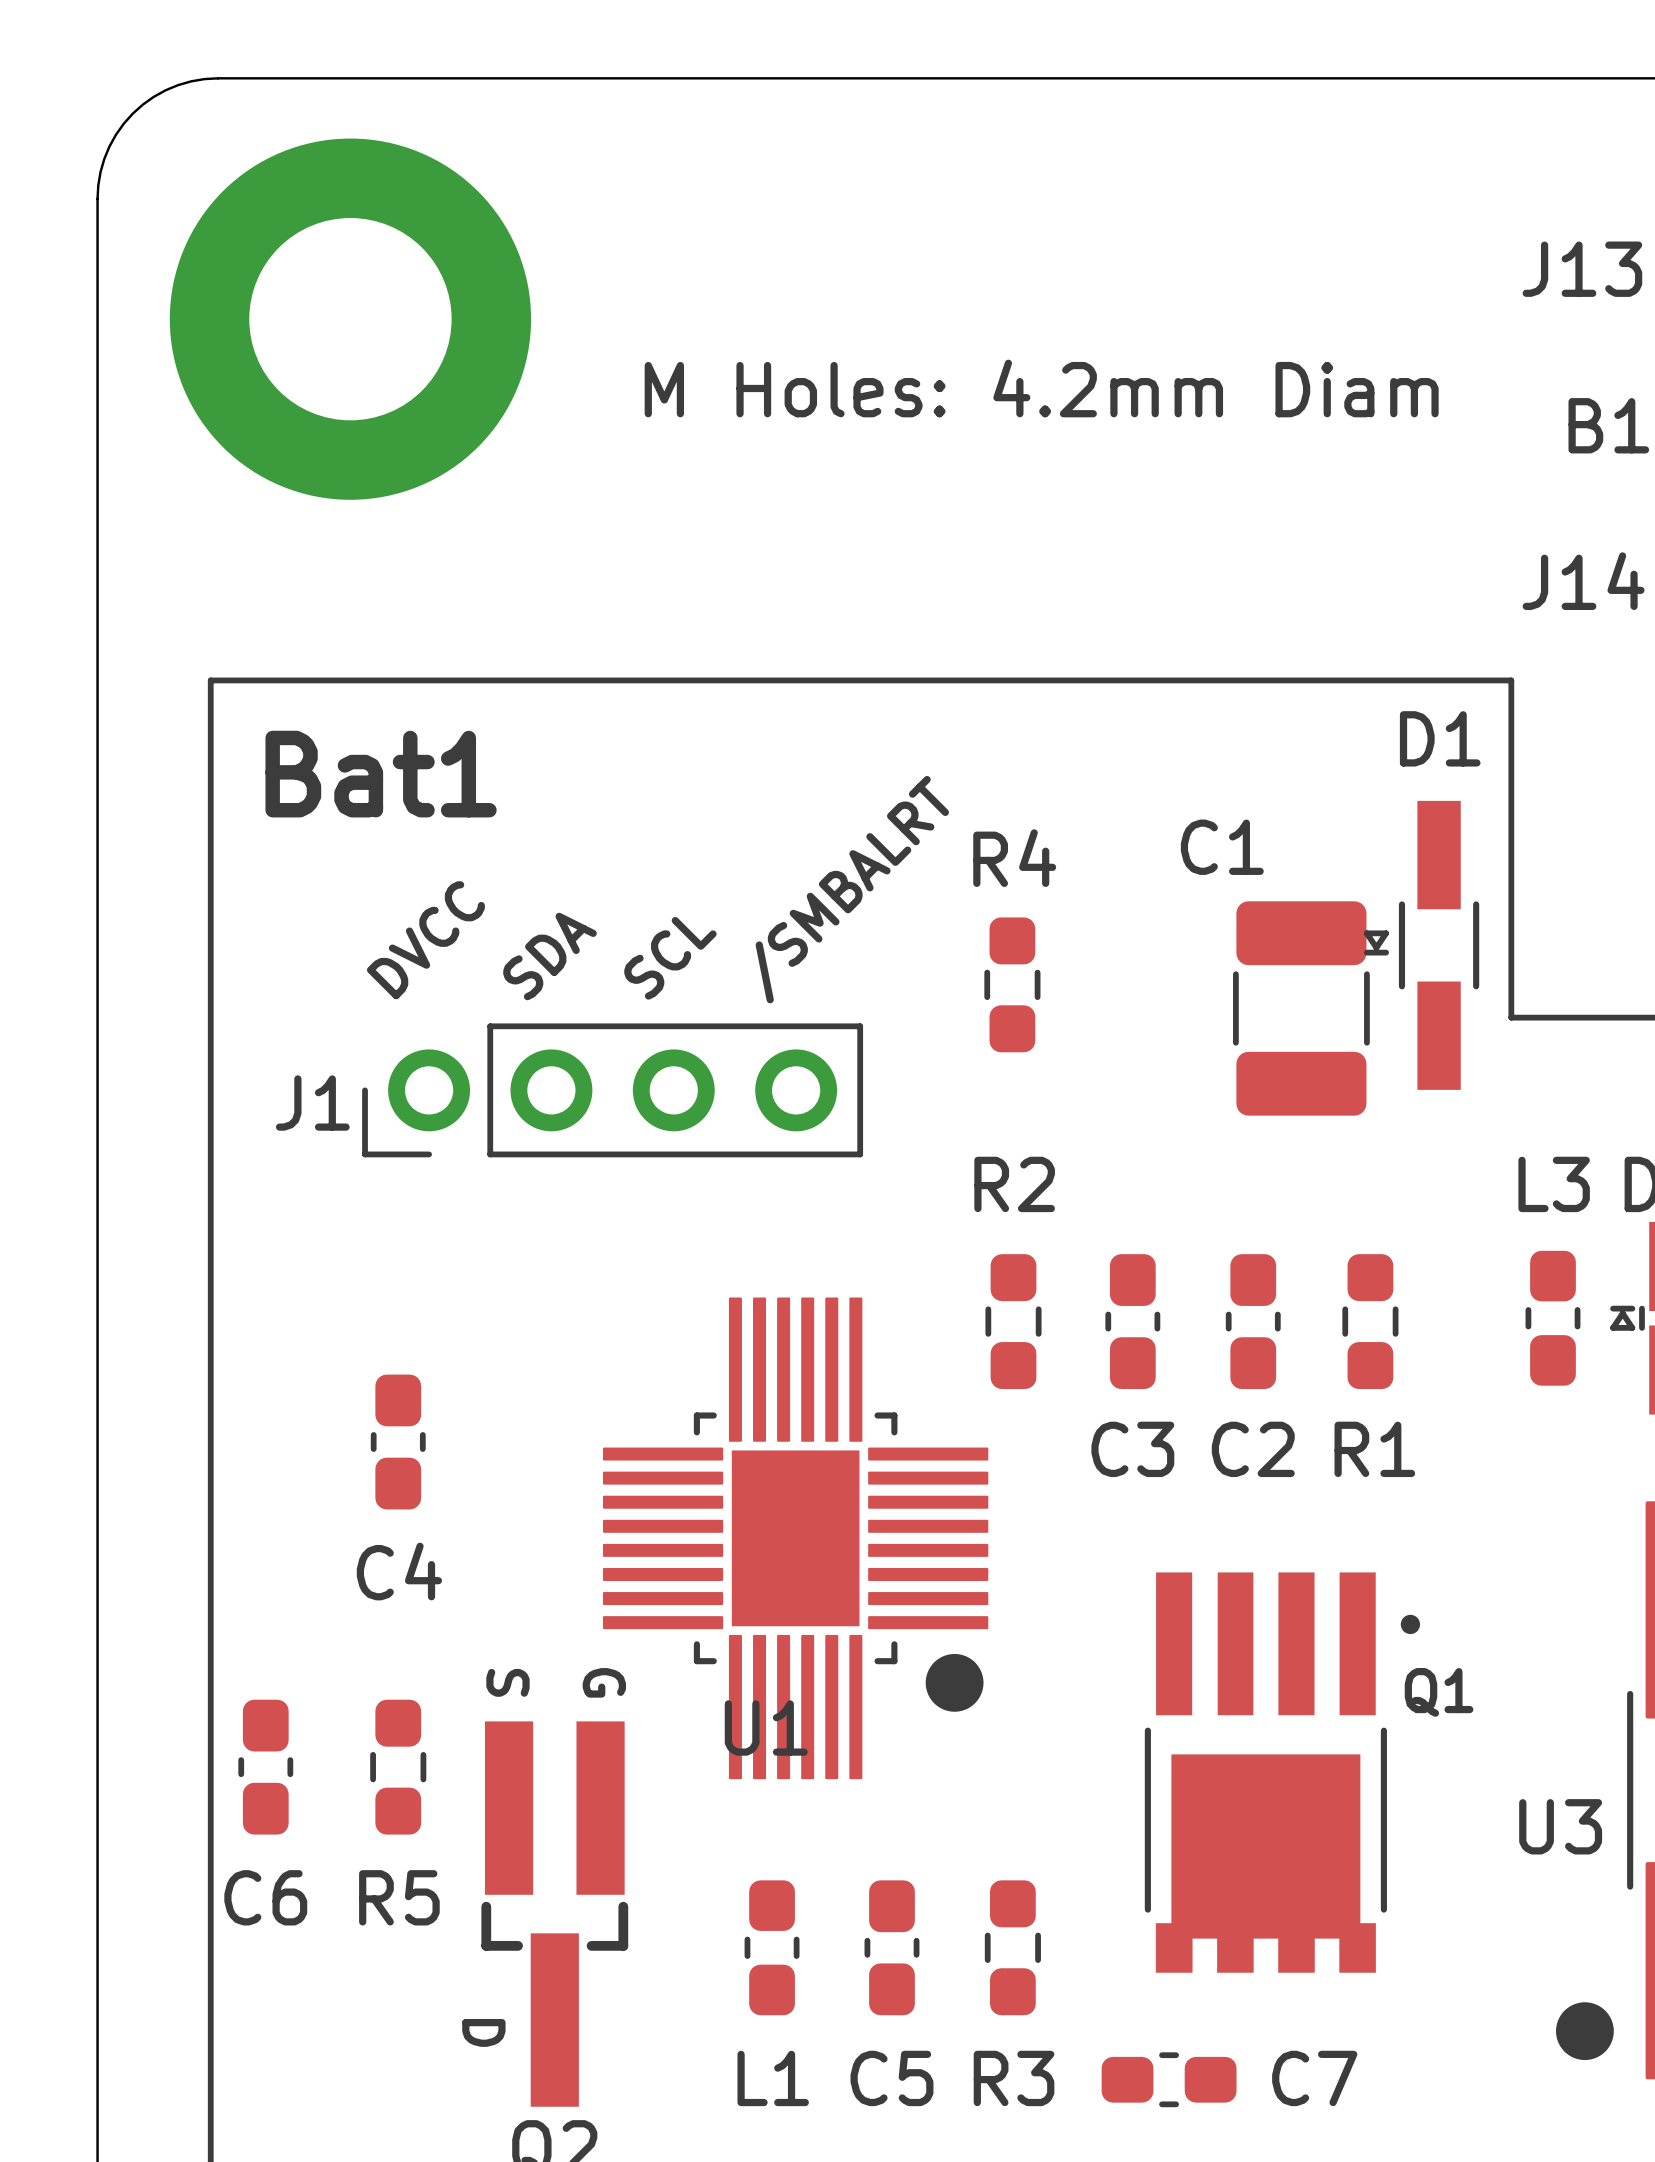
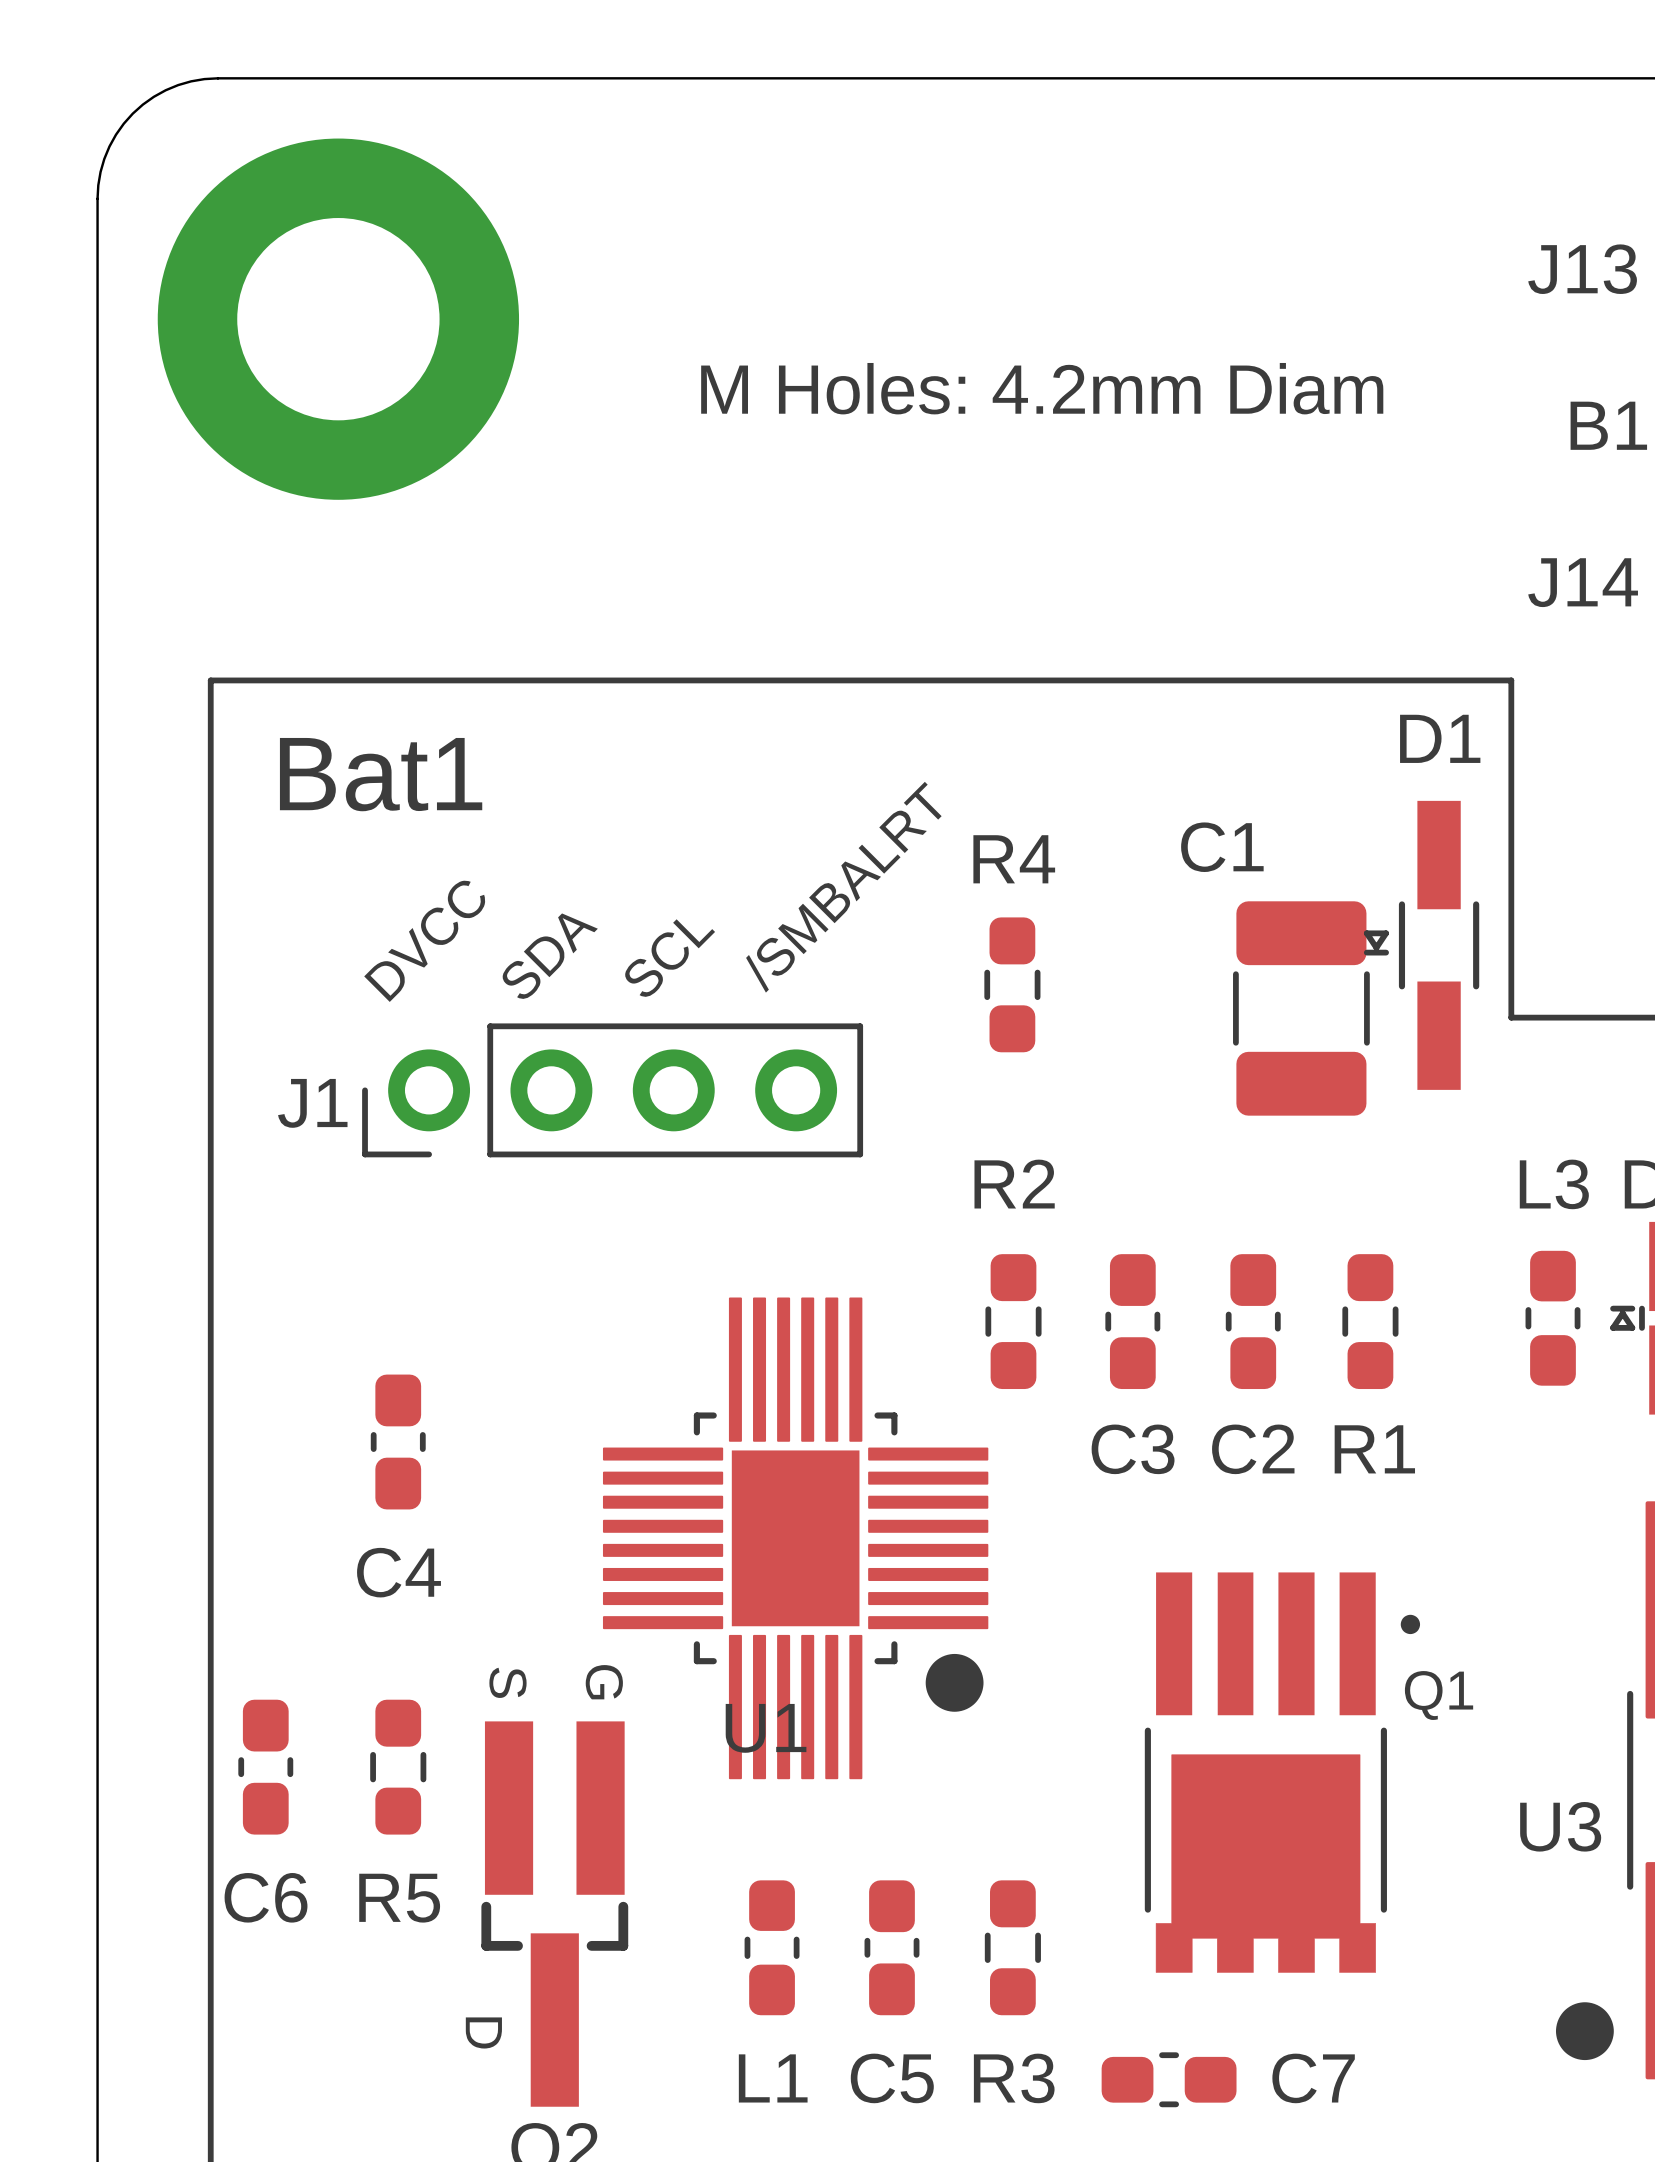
part position: (350, 319) -> (338, 319)

